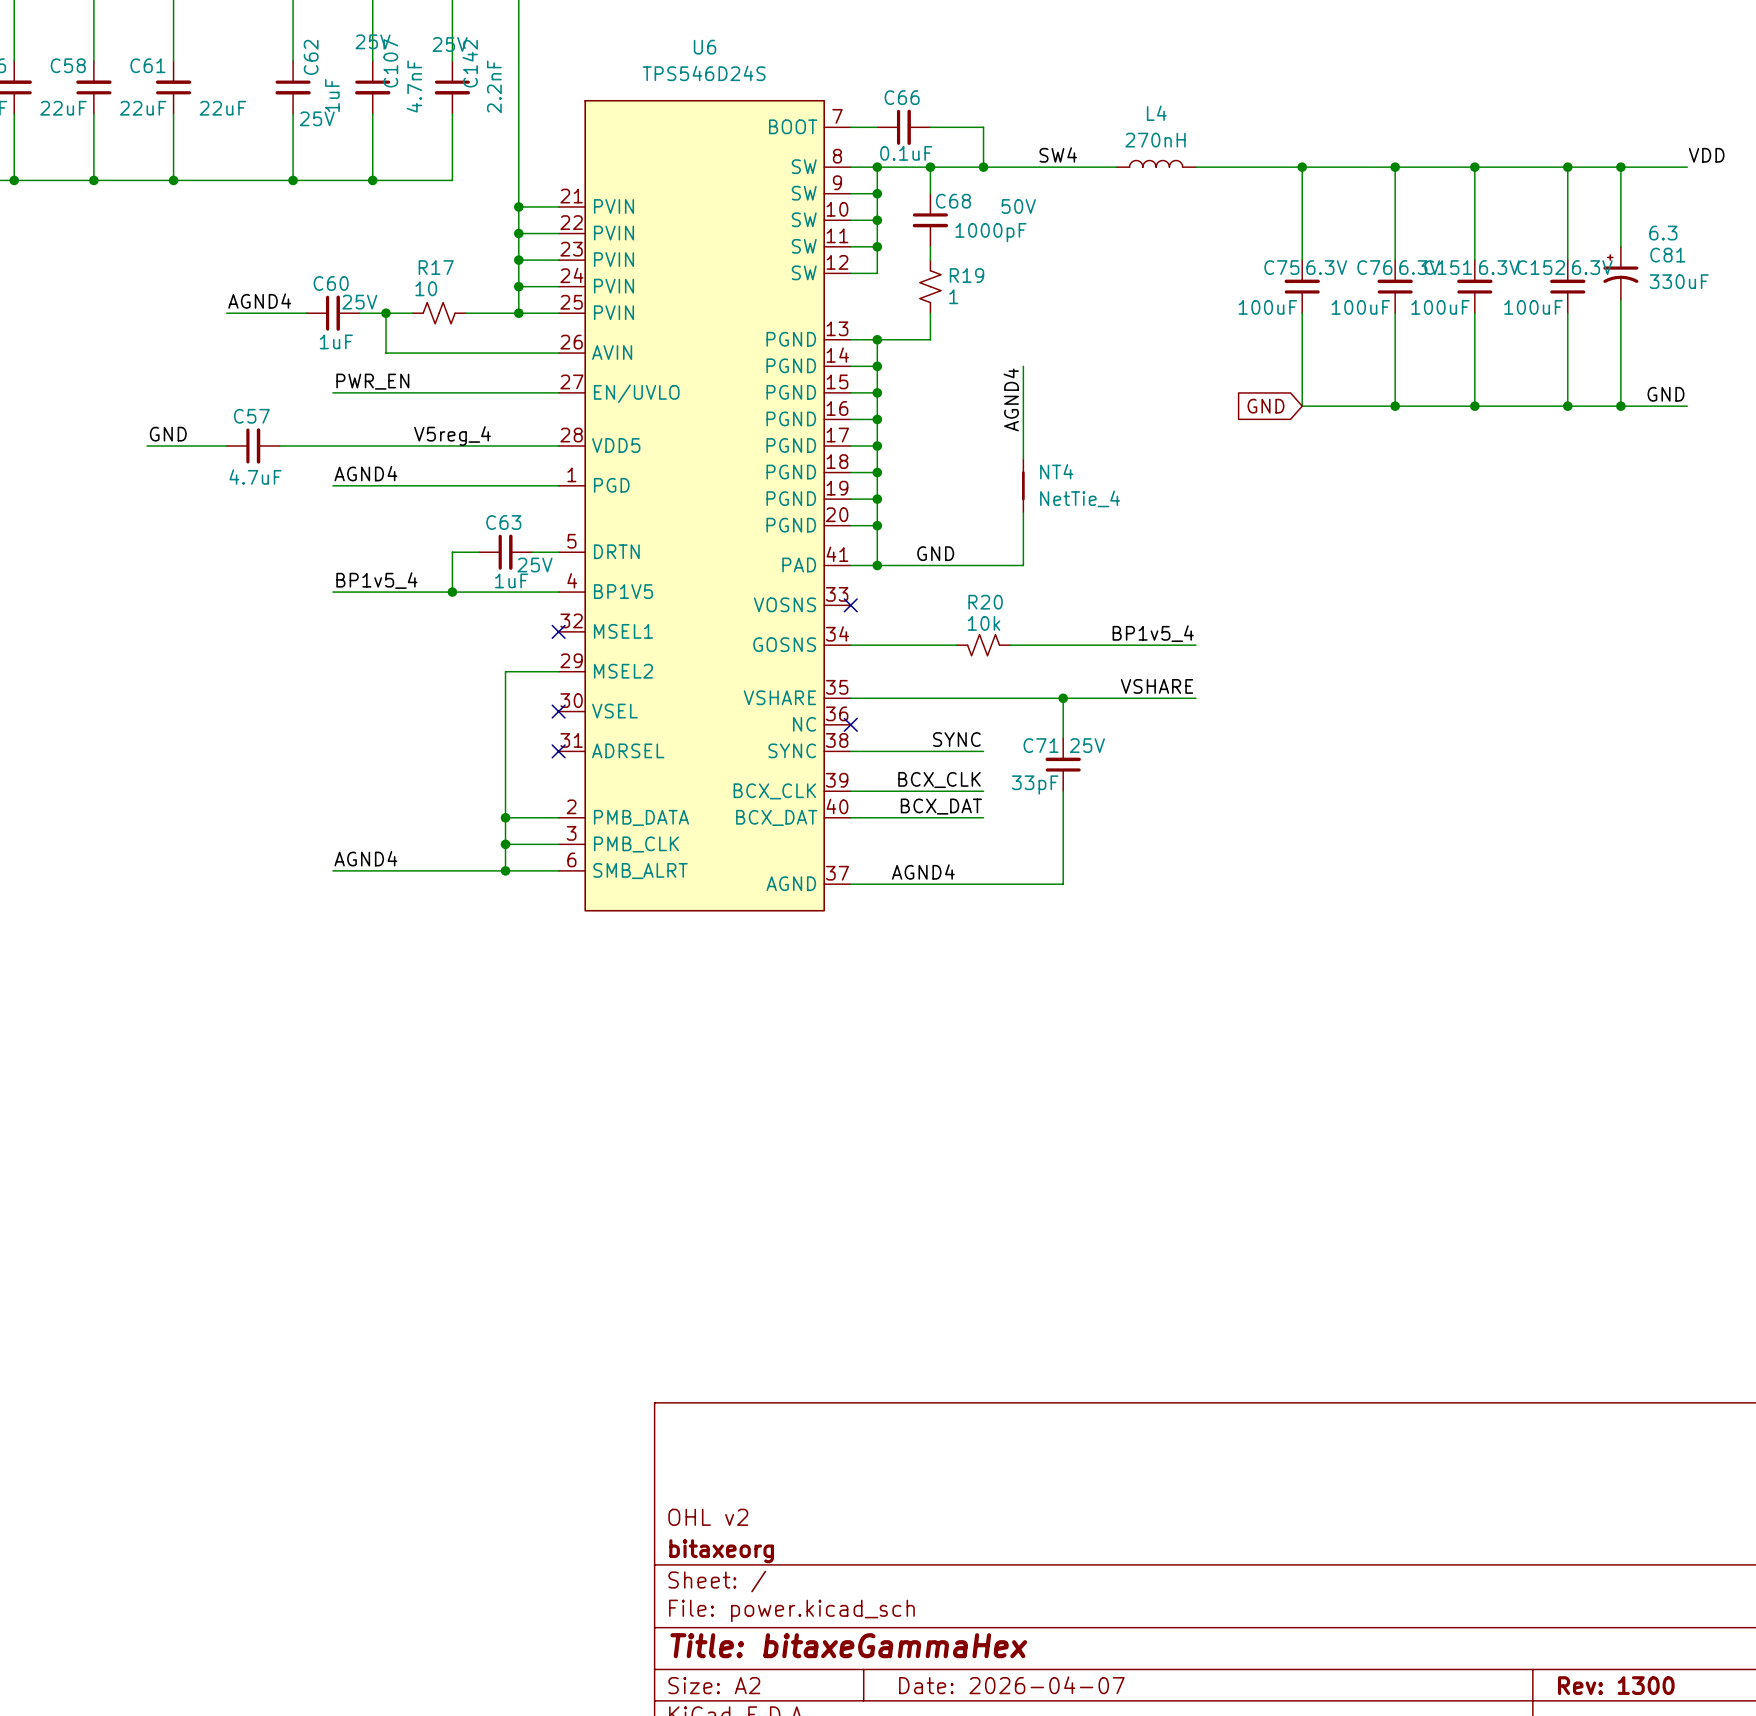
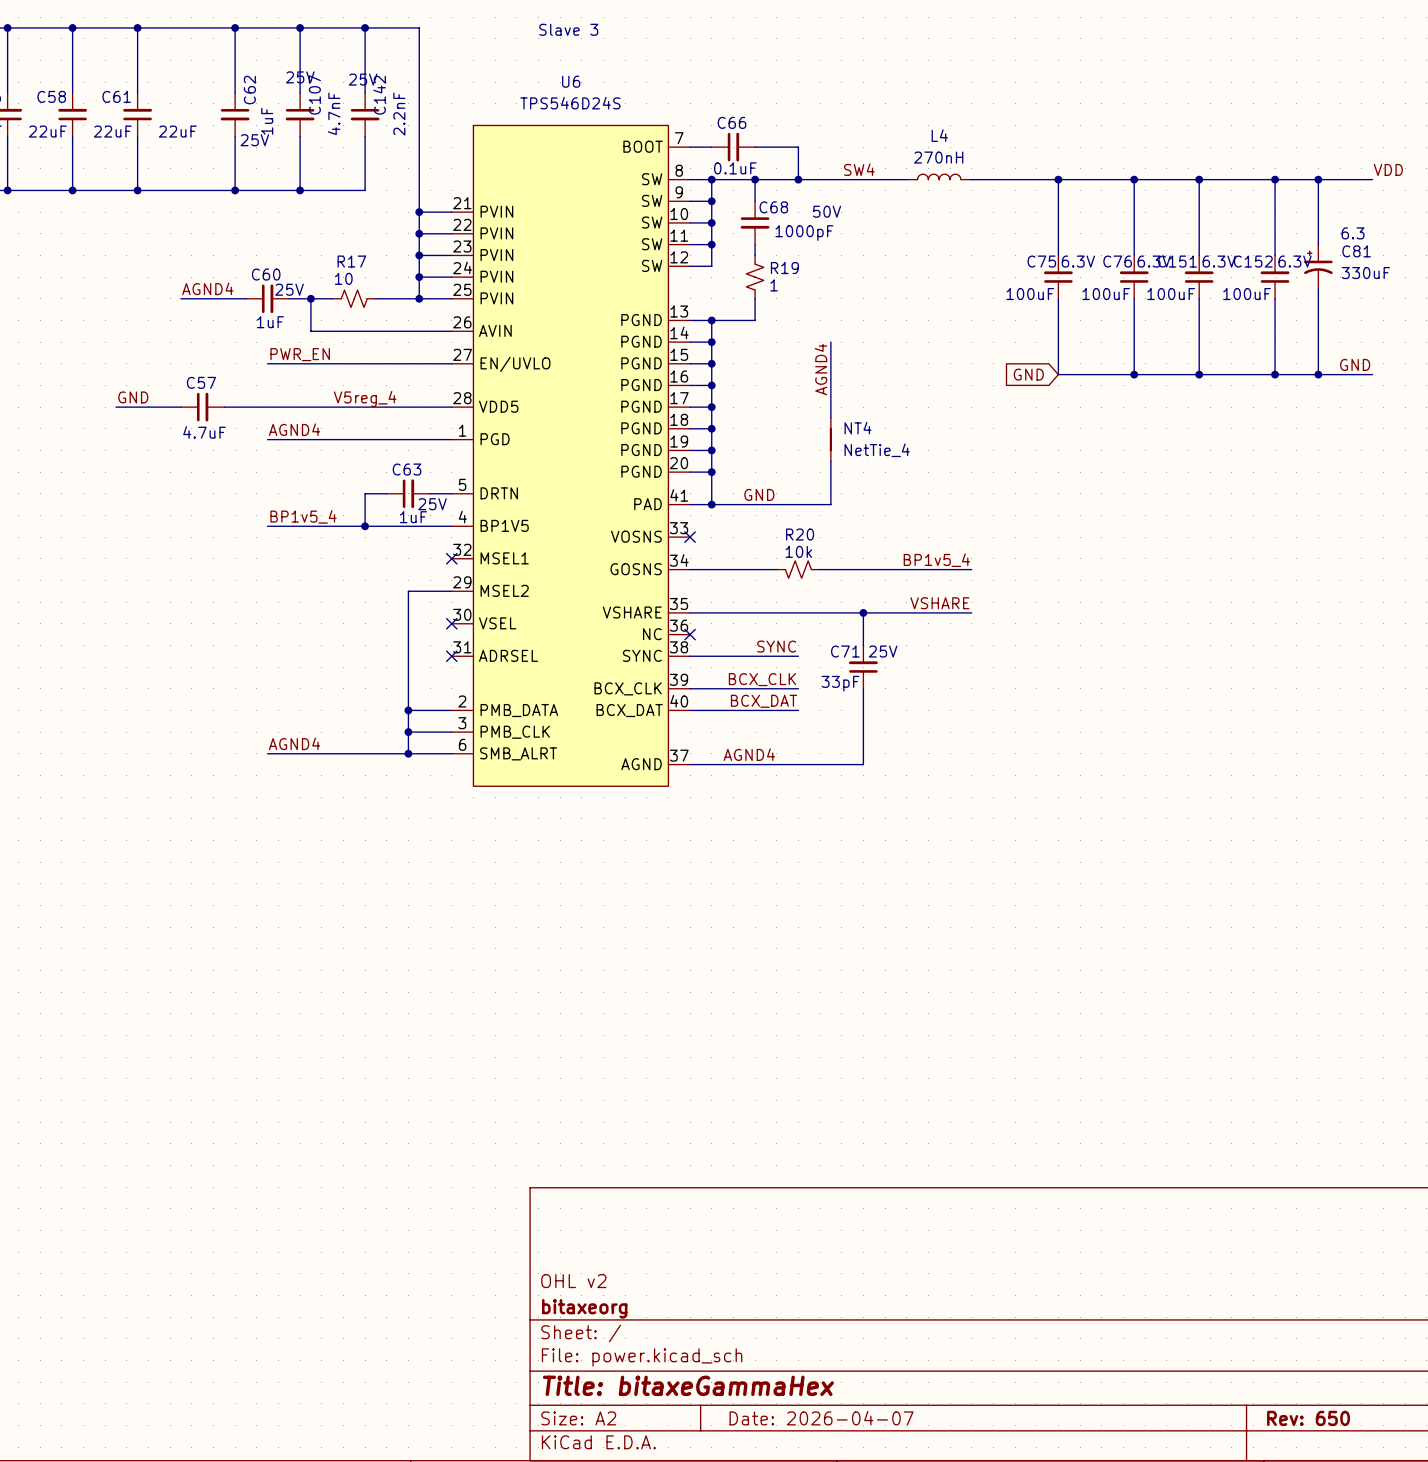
title block: Rev: 1300 (1616, 1685) -> Rev: 650 (1308, 1418)

